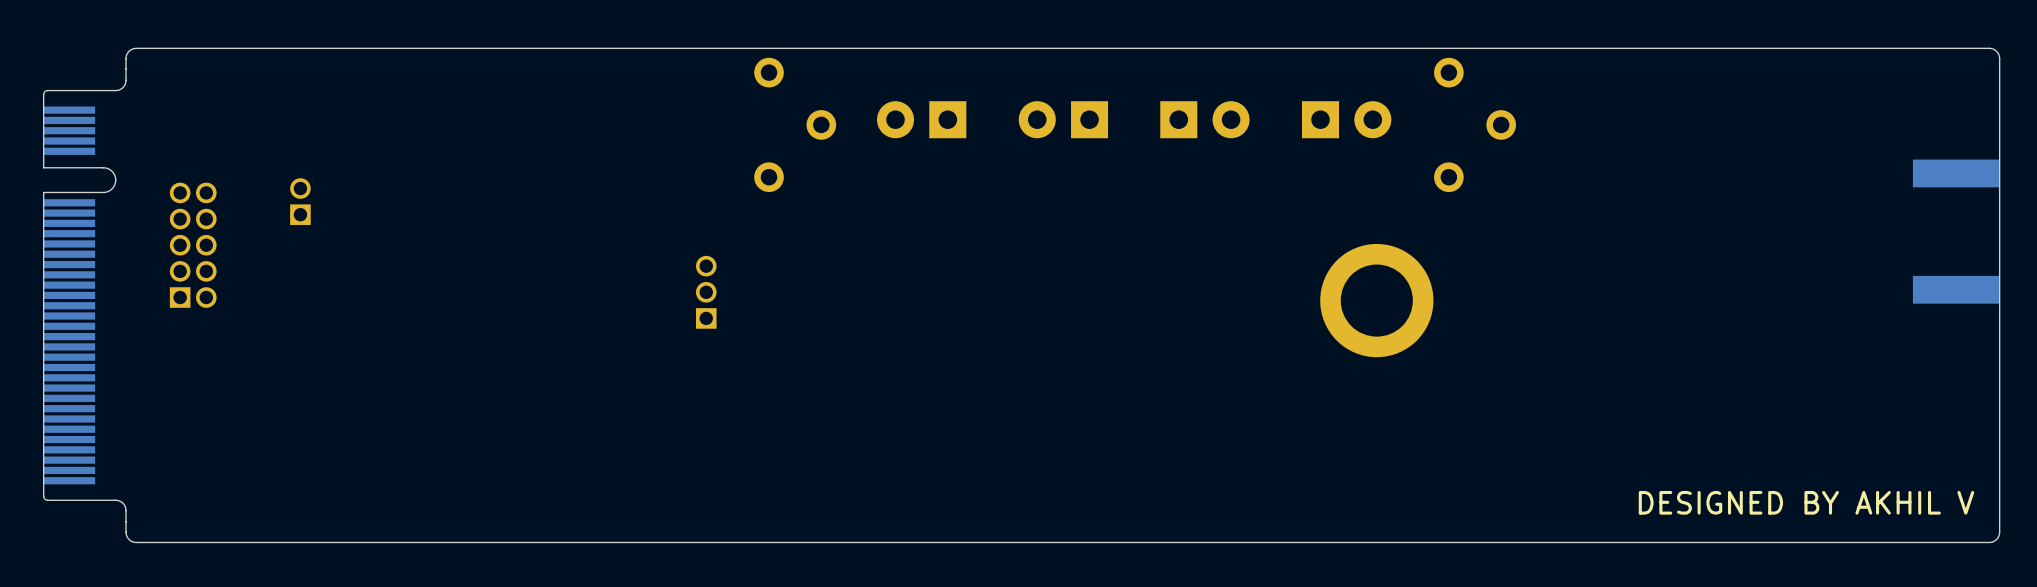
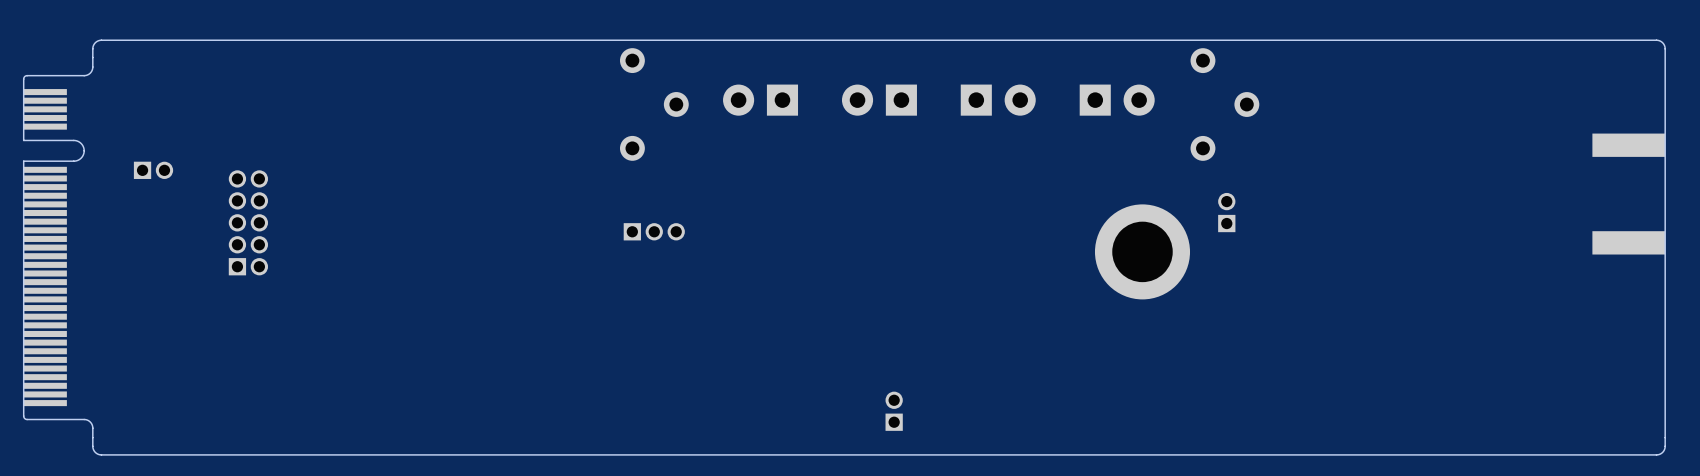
part rotation: 0° (300, 201) -> 90° clockwise (153, 170)
part position: (300, 201) -> (153, 170)
part position: (193, 245) -> (248, 222)
part: none -> (1226, 212)
part rotation: 0° (706, 292) -> 90° clockwise (654, 231)
part position: (706, 292) -> (654, 231)
part: none -> (894, 411)
text: DESIGNED BY AKHIL V (1806, 502) -> none

